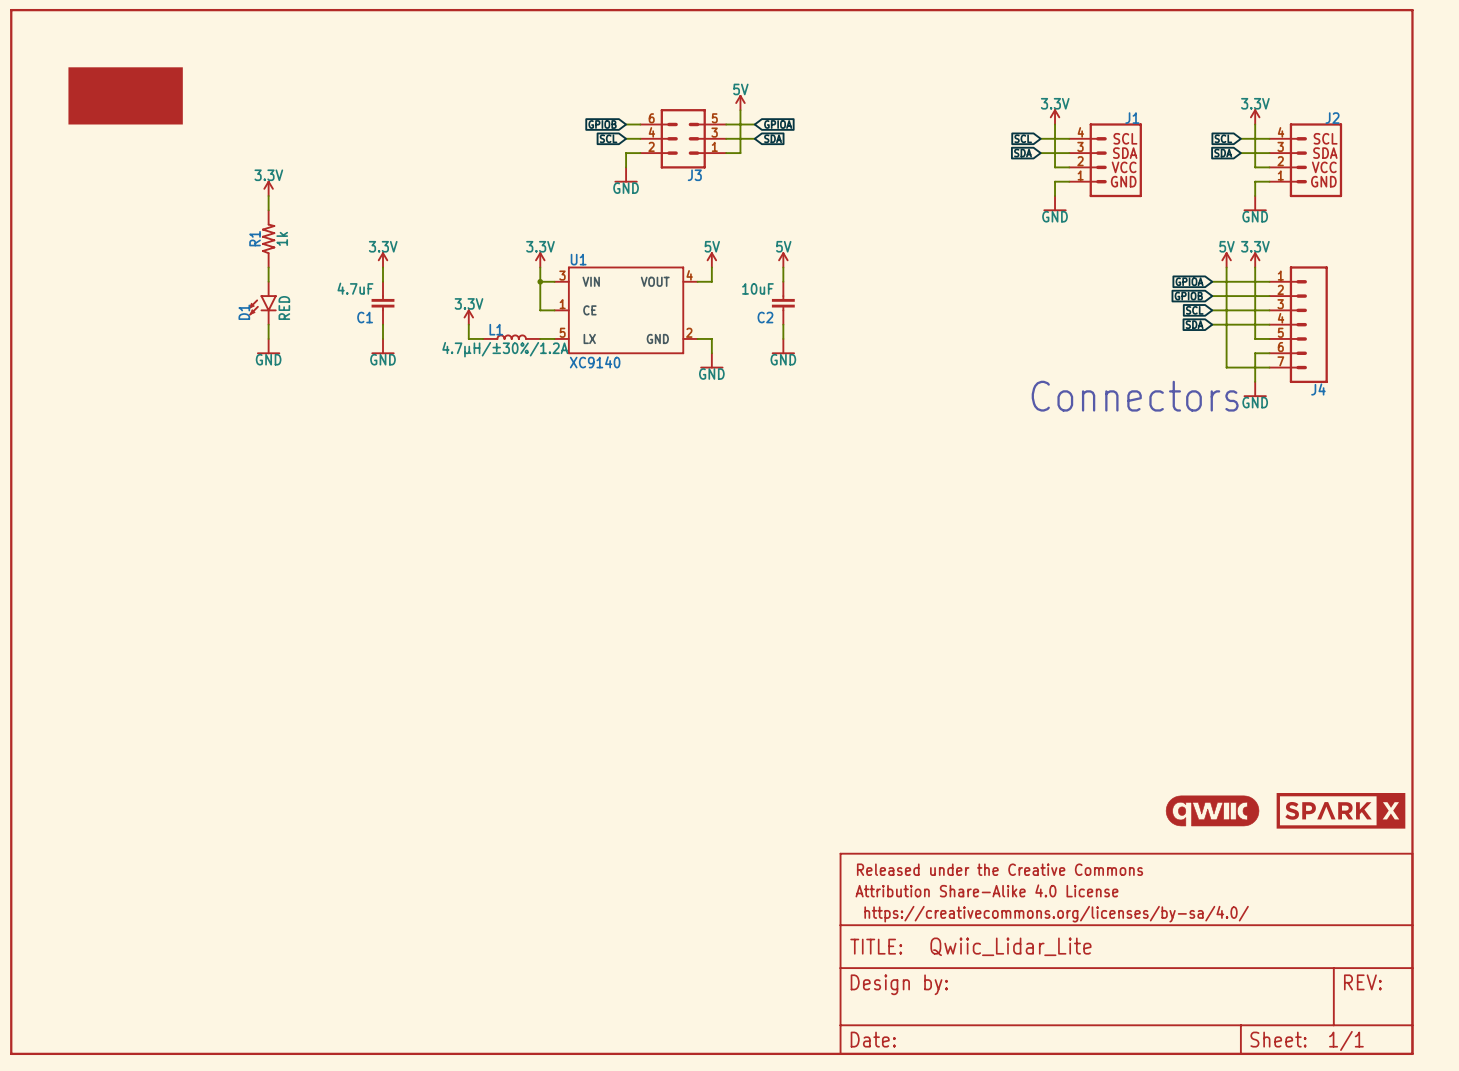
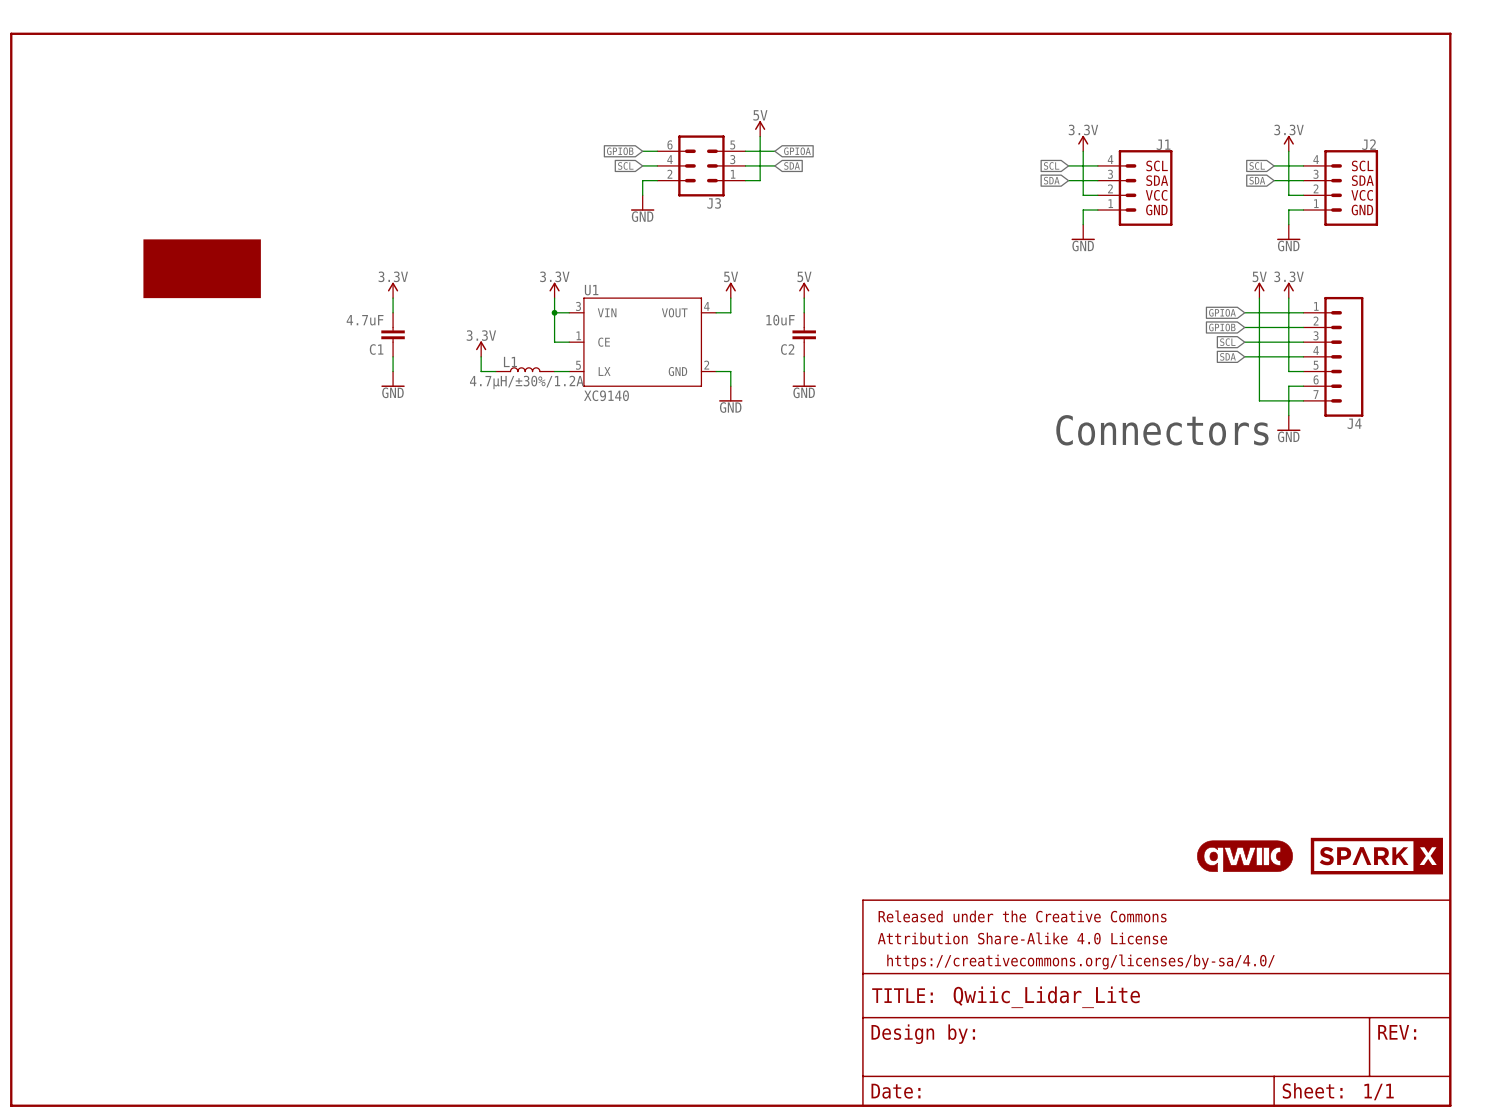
part: (125, 95) -> none
power symbol: 3.3V (268, 188) -> none
wire: (268, 195) (268, 210) -> none
part: none -> (202, 268)
R1: 1k (268, 238) -> none
wire: (268, 267) (268, 281) -> none
D1: RED (262, 303) -> none
wire: (268, 324) (268, 338) -> none
power symbol: GND (268, 346) -> none

